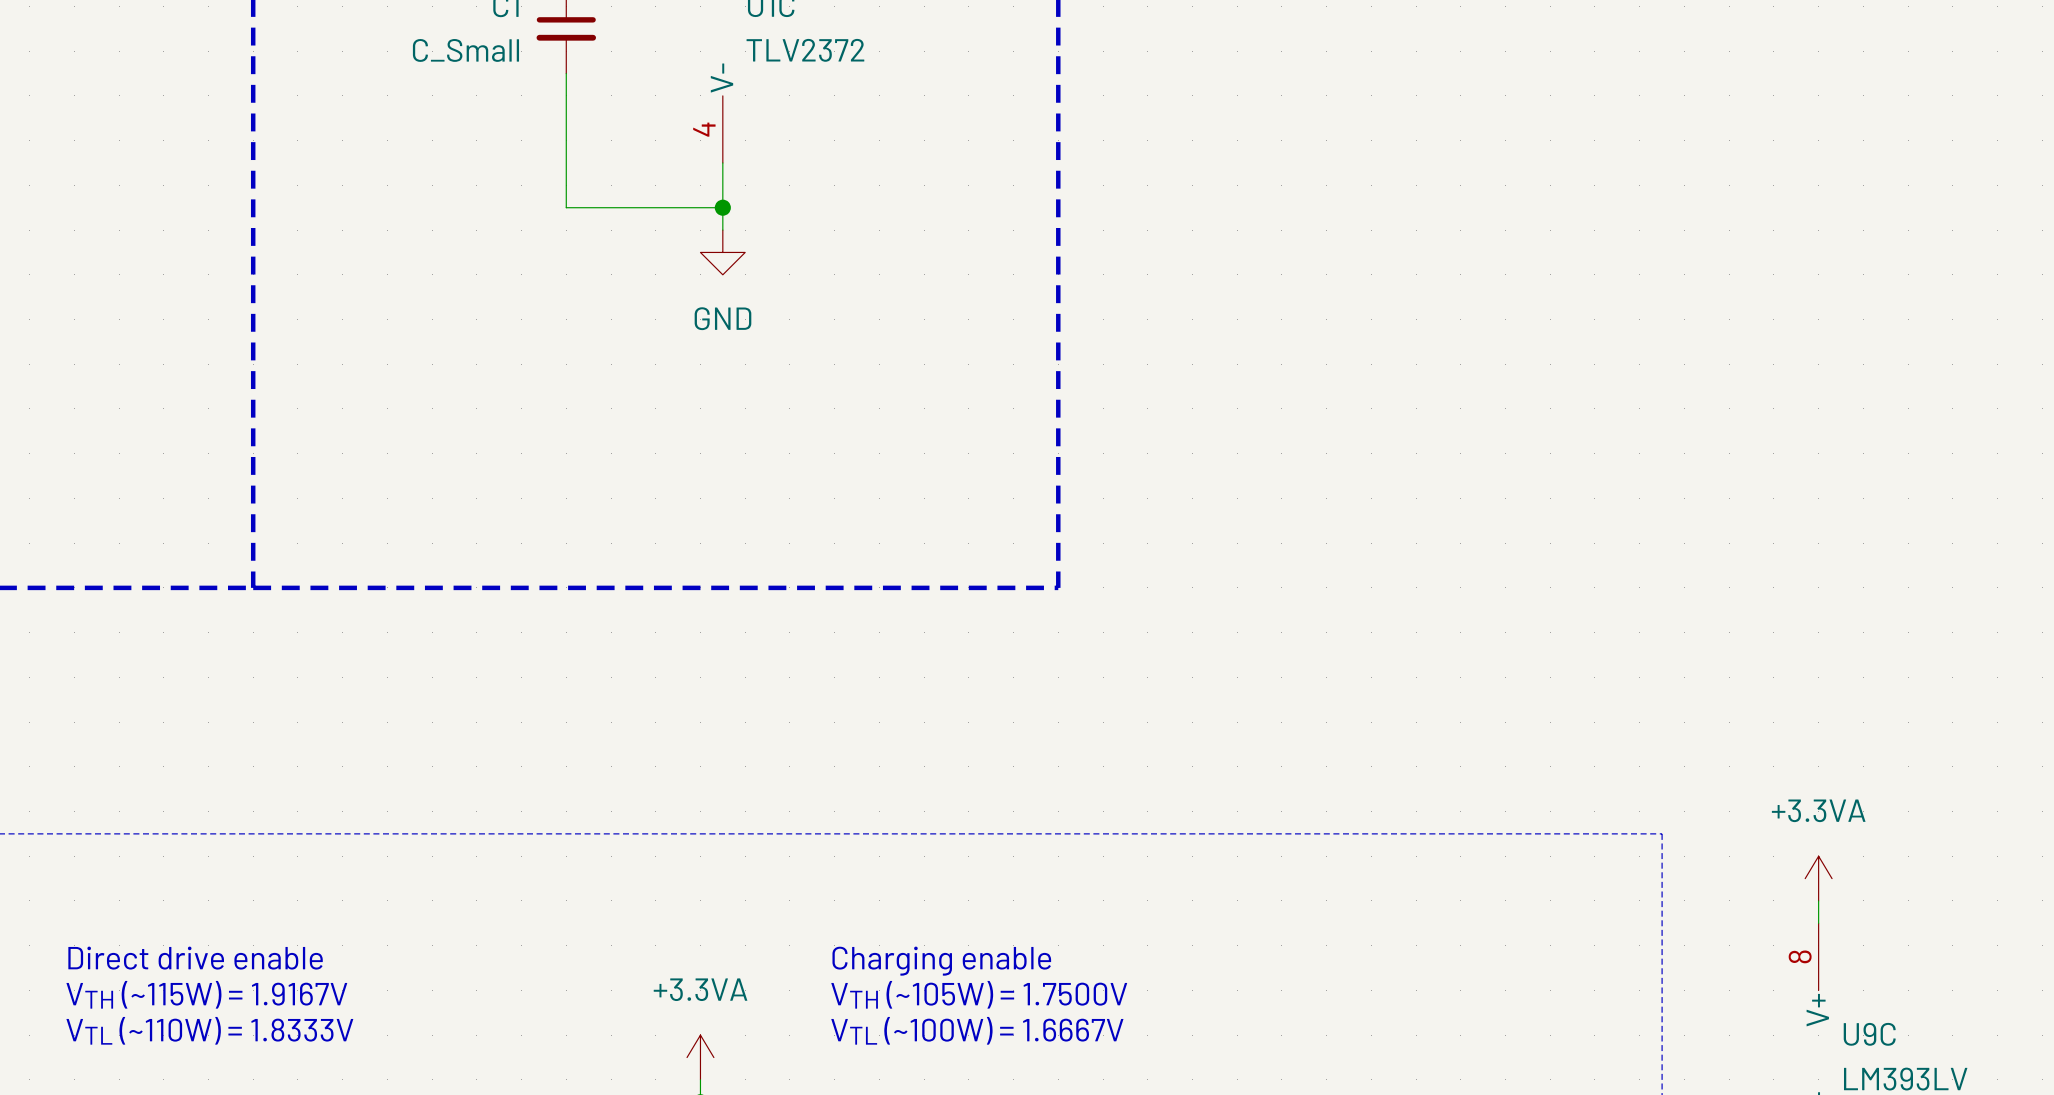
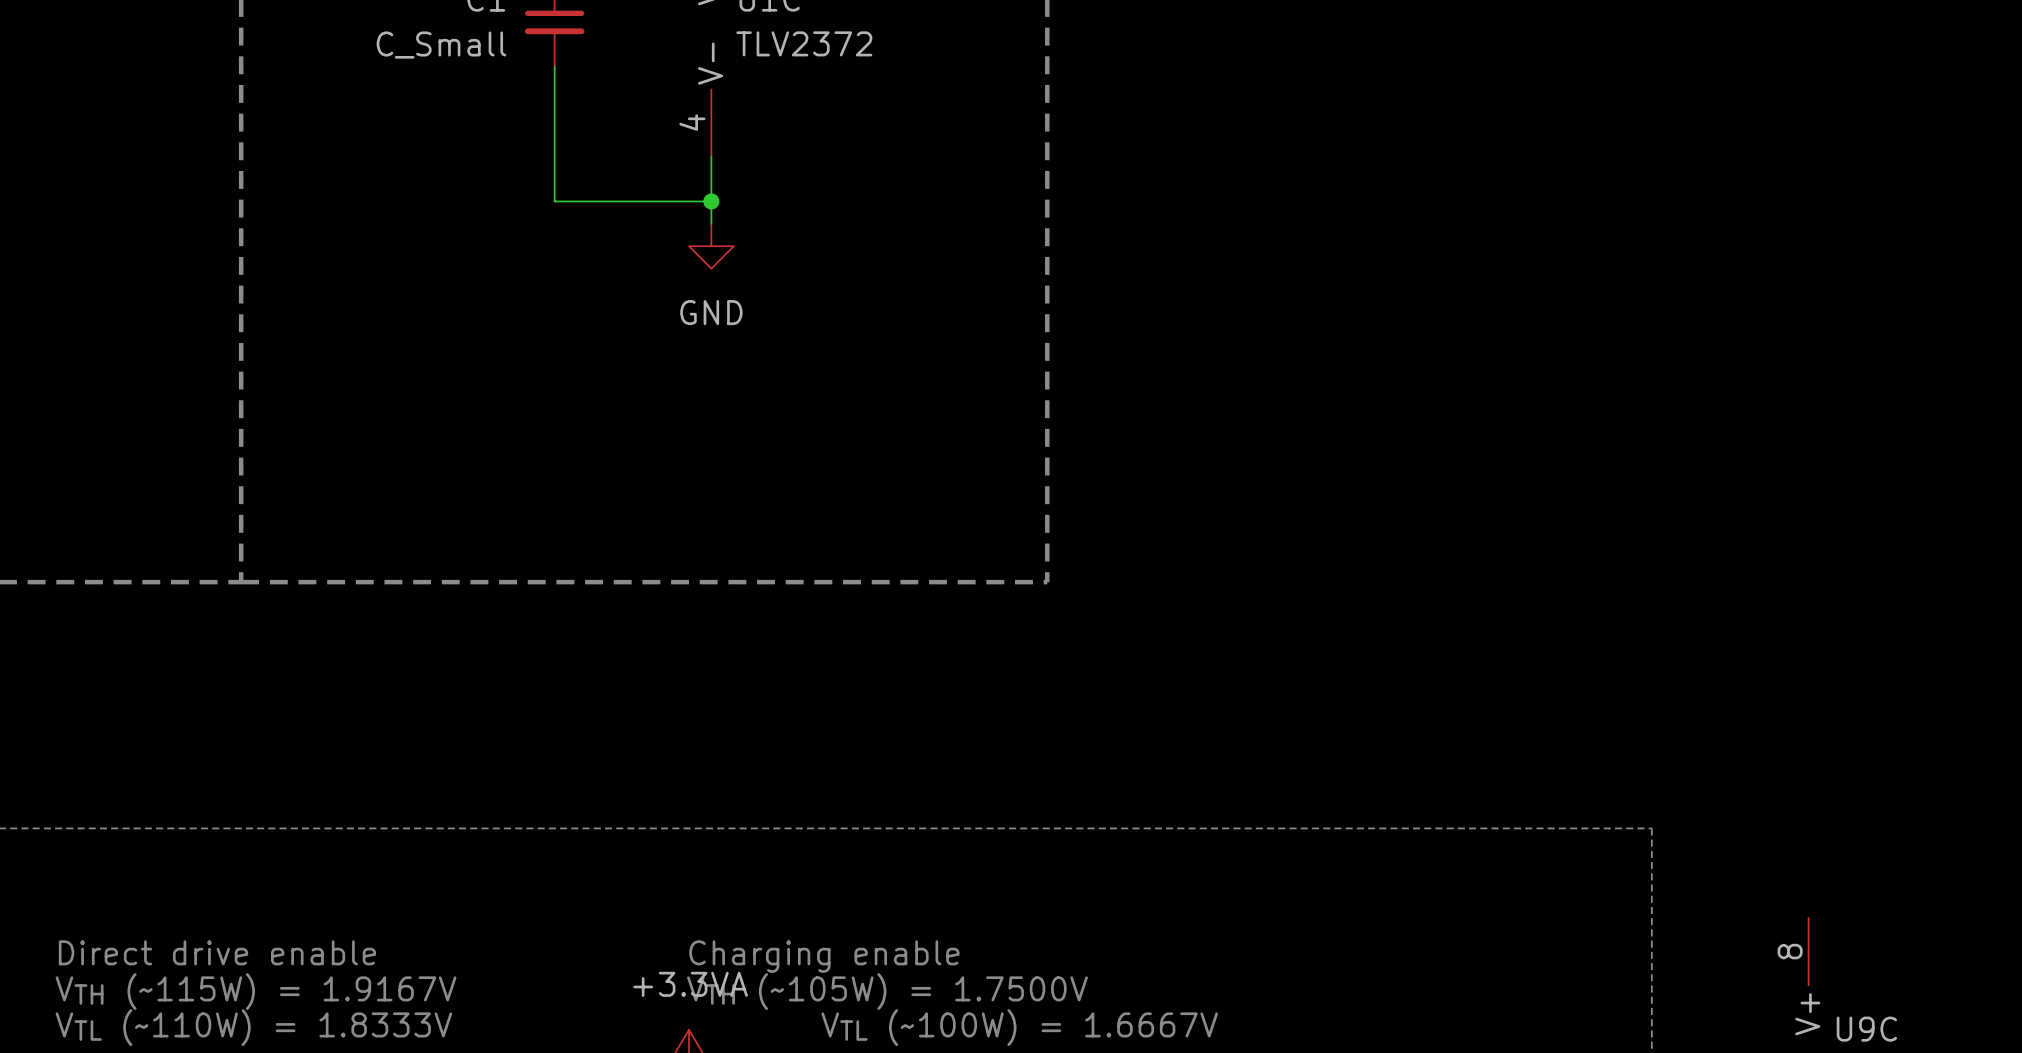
power symbol: +3.3VA (1818, 878) -> none
wire: (1818, 900) (1818, 923) -> none
text position: Charging enable (941, 961) -> Charging enable (824, 956)
text position: VTH (~105W) = 1.7500V (979, 994) -> VTH (~105W) = 1.7500V (887, 991)

